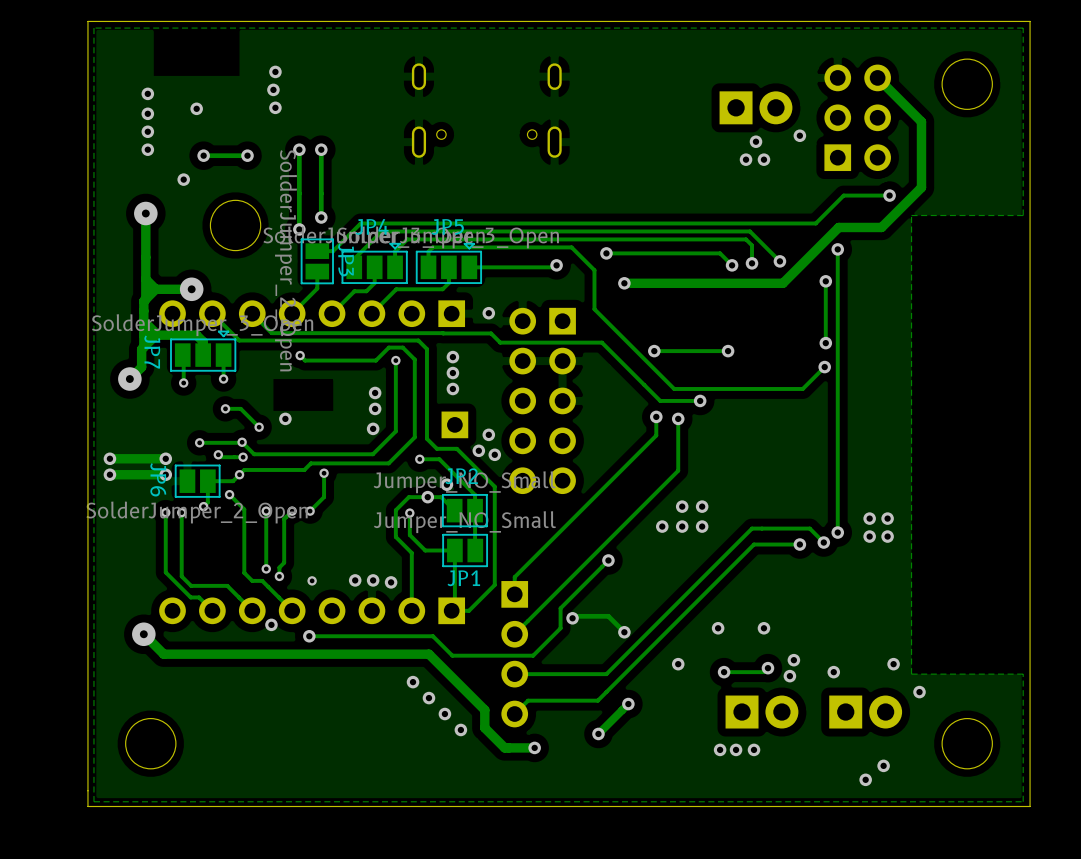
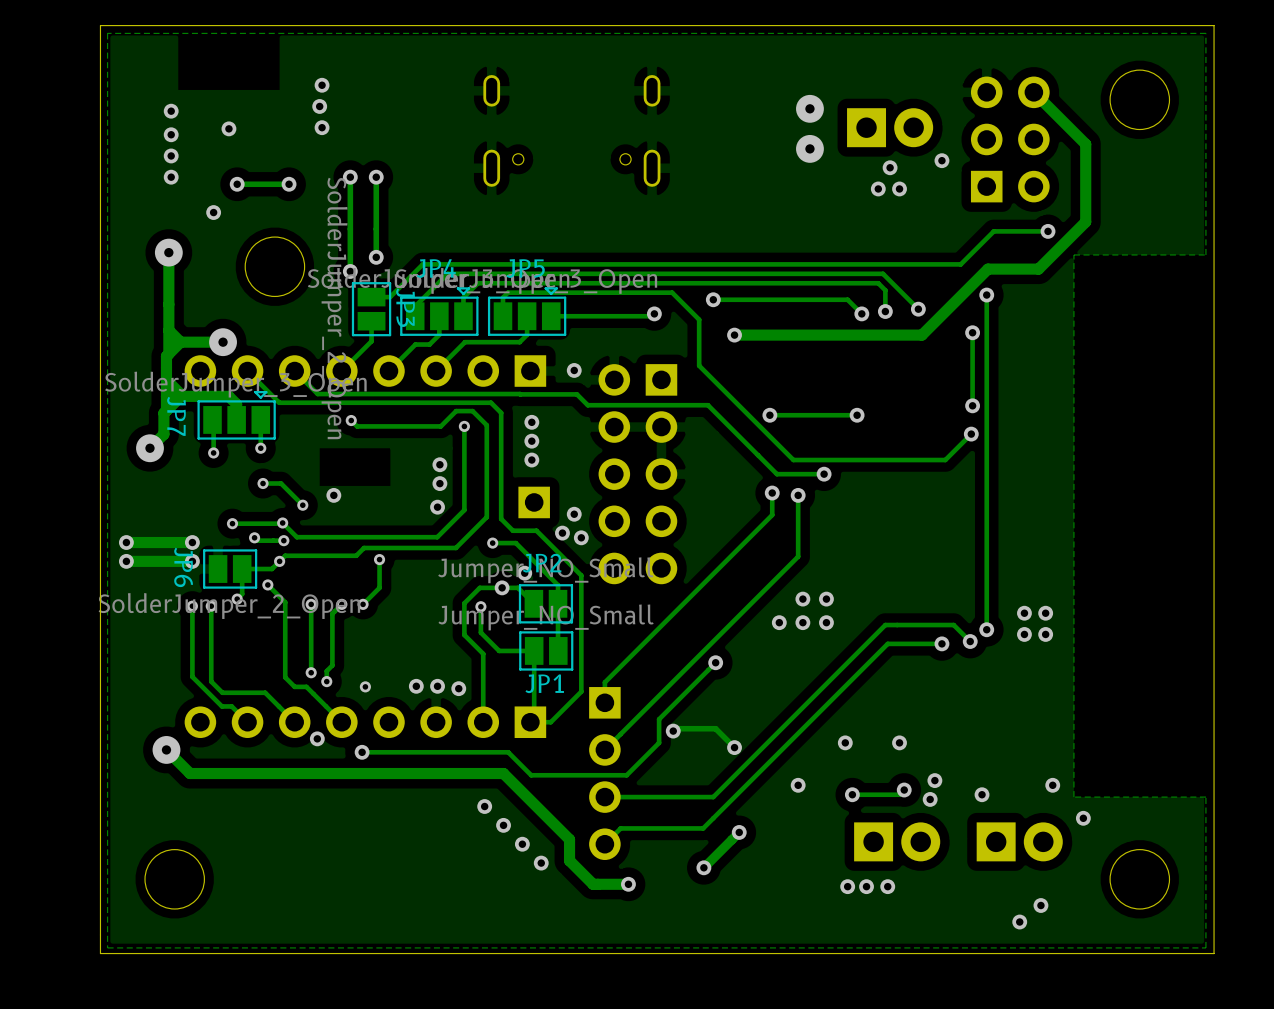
via: none -> (809, 108)
via: none -> (809, 148)

